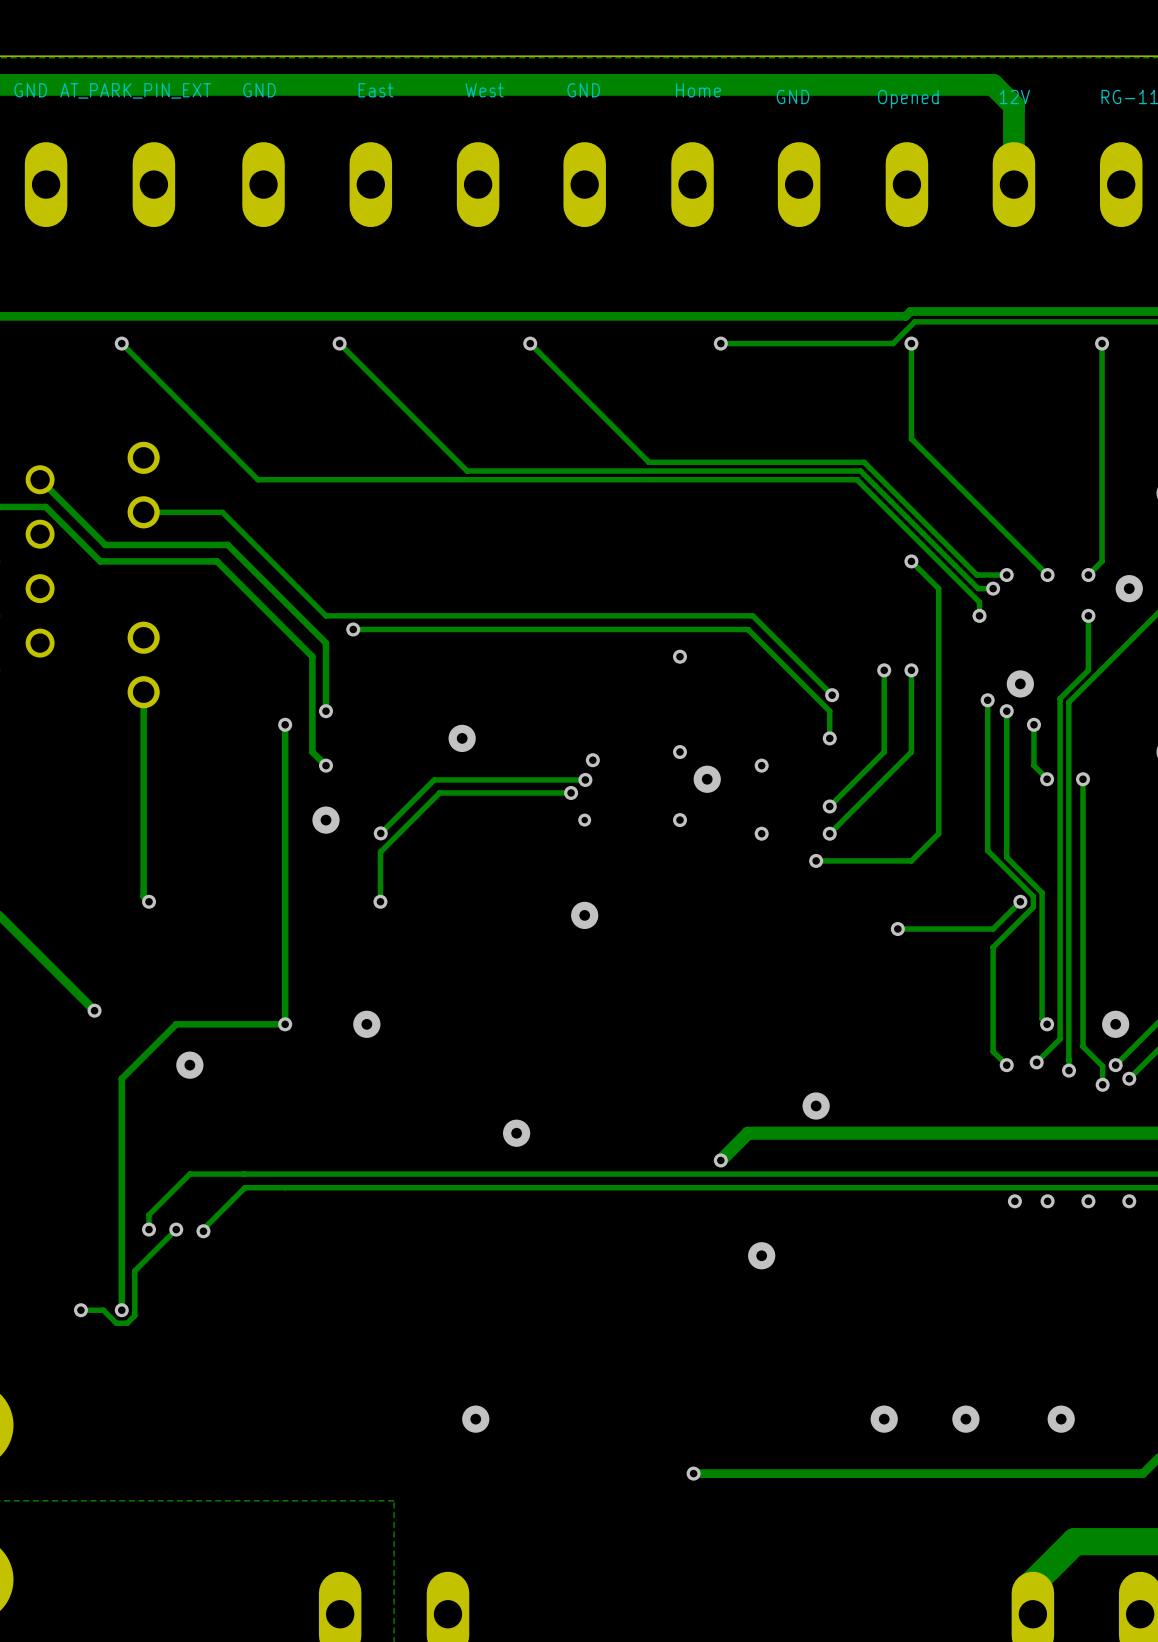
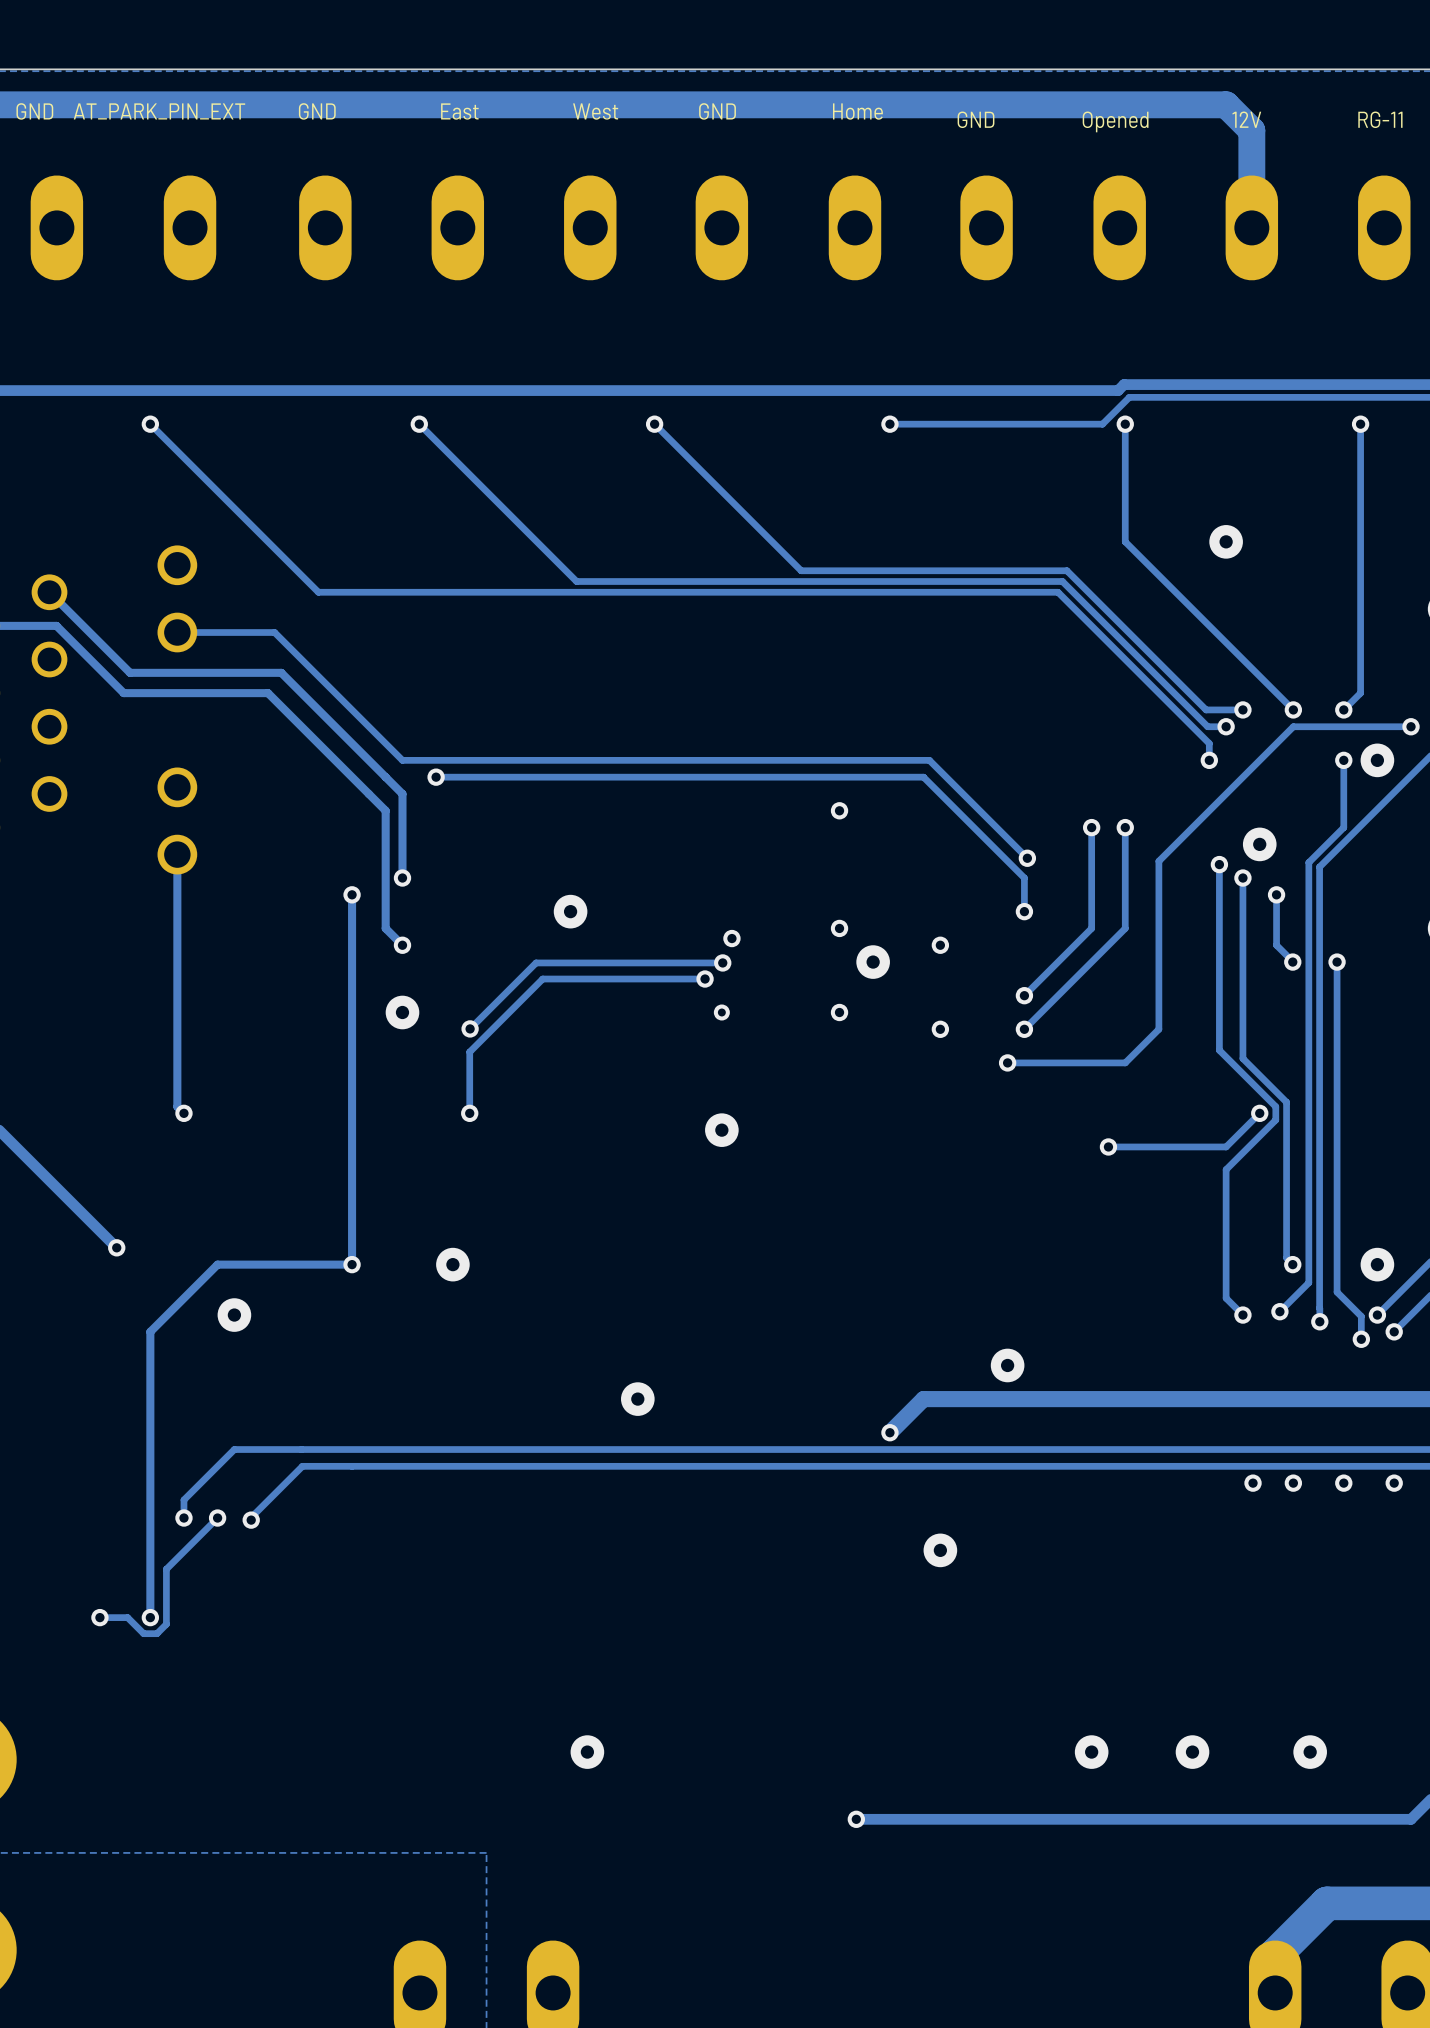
via: none -> (1226, 541)
track: (911, 561) (938, 588) (938, 697) -> (1411, 726) (1293, 726) (1158, 861)
via: (911, 561) -> none
via position: (1129, 588) -> (1377, 760)
via: none -> (1411, 726)

